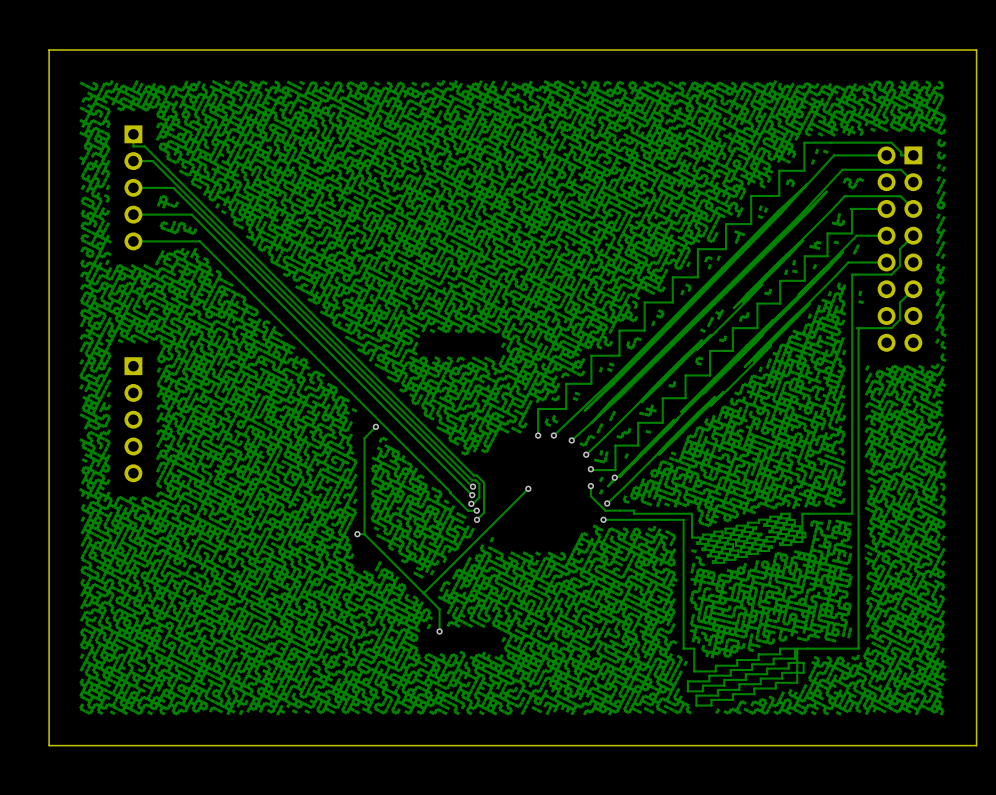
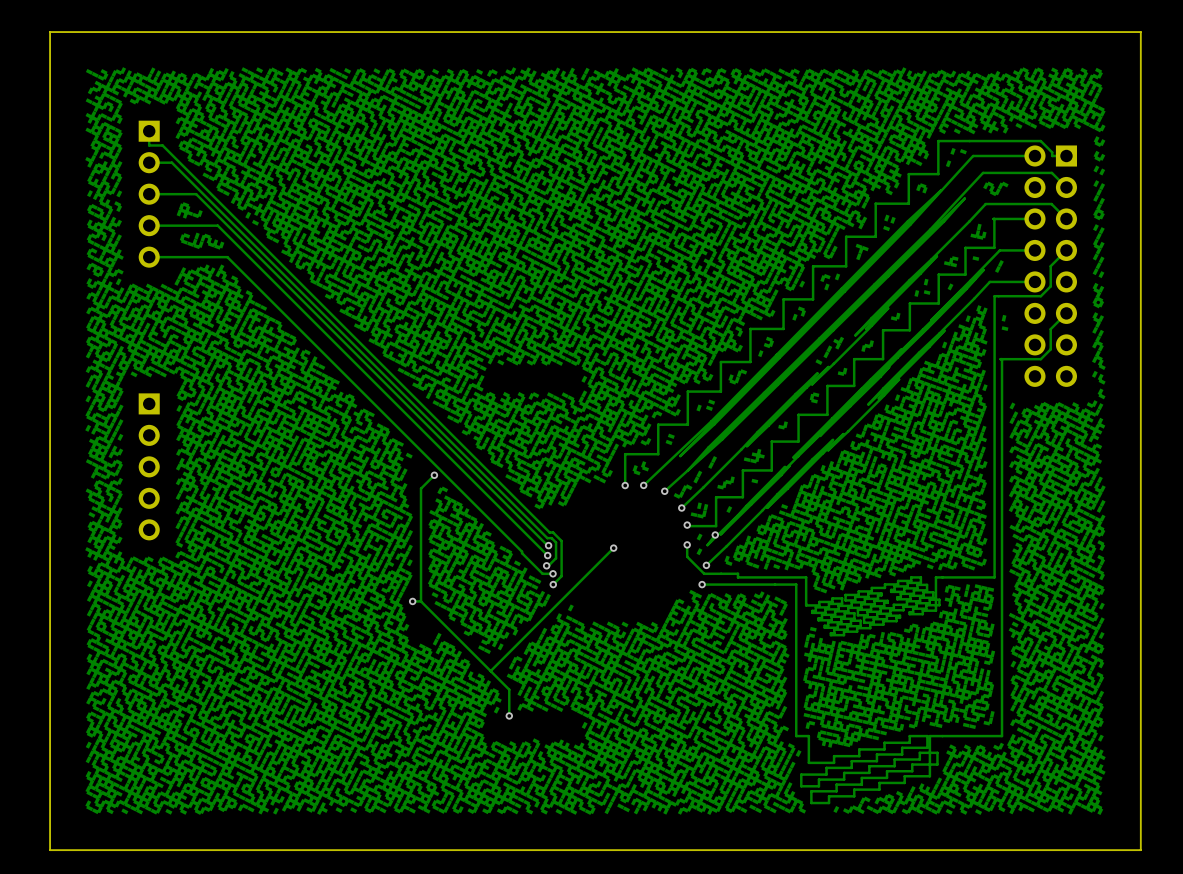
drawing: [750, 346, 821, 425] -> none
drawing: none -> [879, 384, 974, 466]
drawing: [734, 411, 763, 447] -> none
drawing: none -> [853, 462, 984, 577]
drawing: none -> [963, 474, 969, 482]
drawing: [734, 446, 838, 510] -> none
drawing: none -> [824, 498, 832, 505]
drawing: none -> [835, 565, 852, 591]
drawing: [708, 510, 733, 527] -> none
drawing: none -> [807, 597, 992, 746]
drawing: [691, 535, 853, 654] -> none

